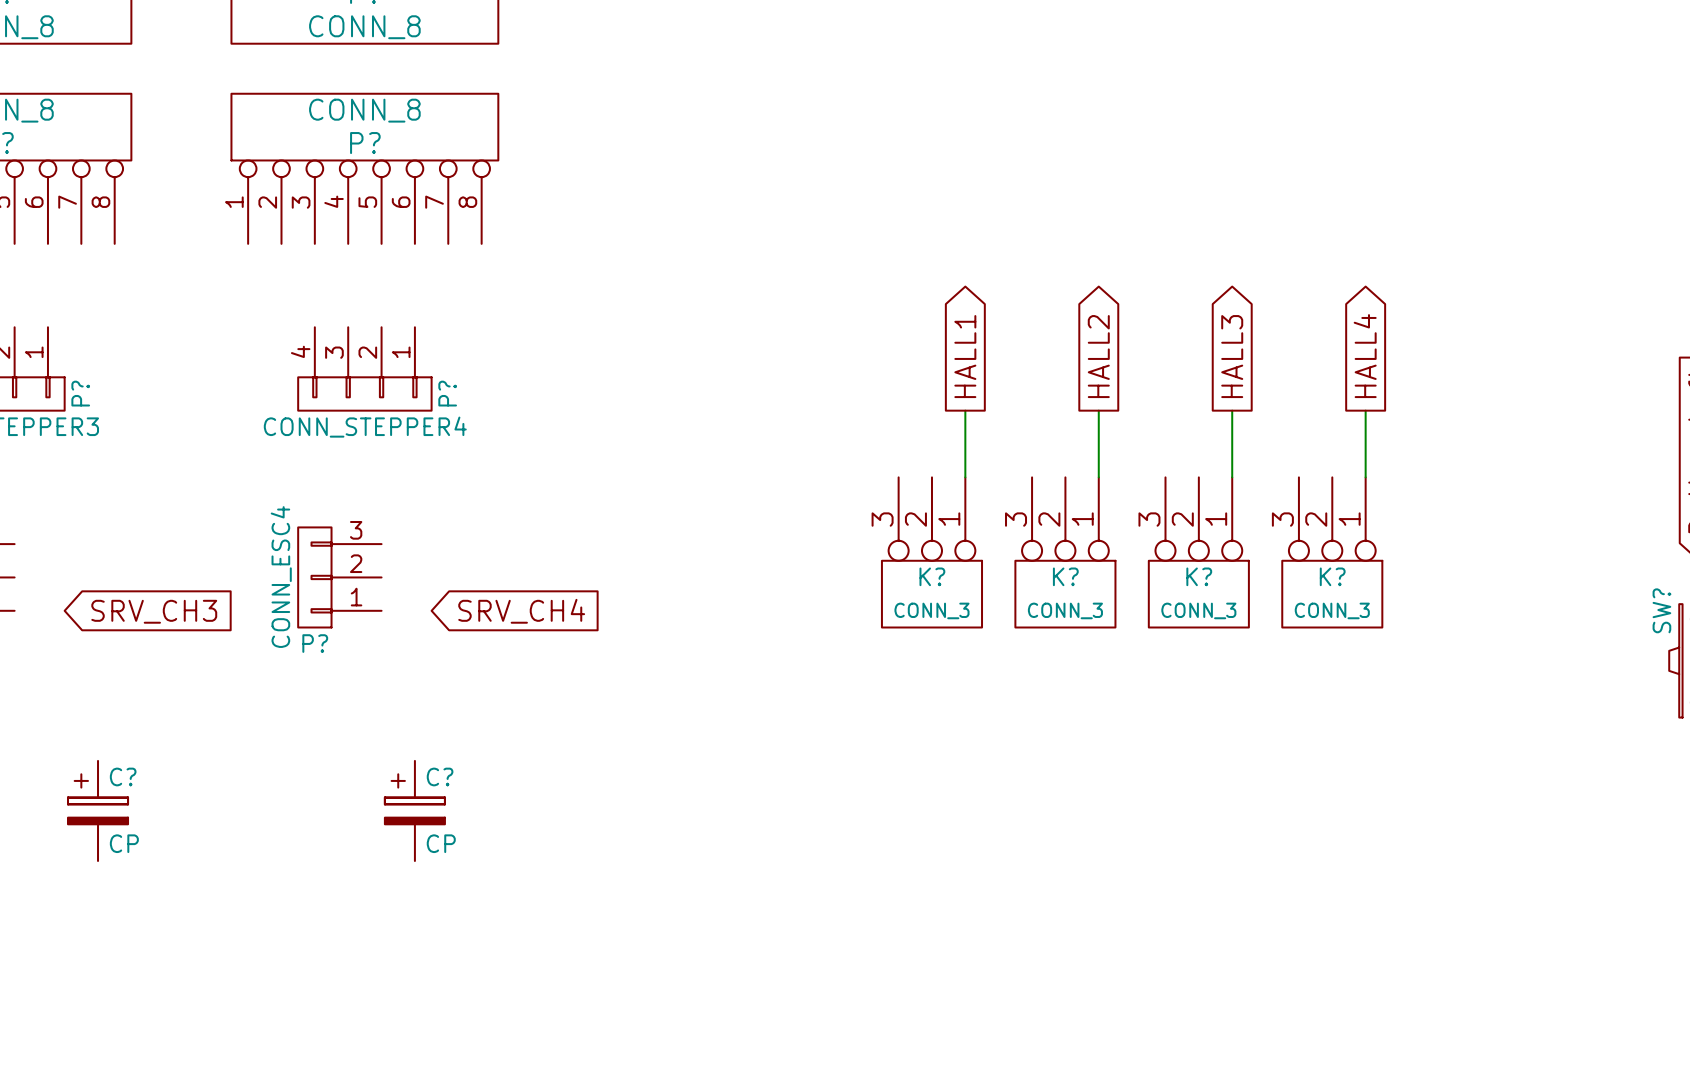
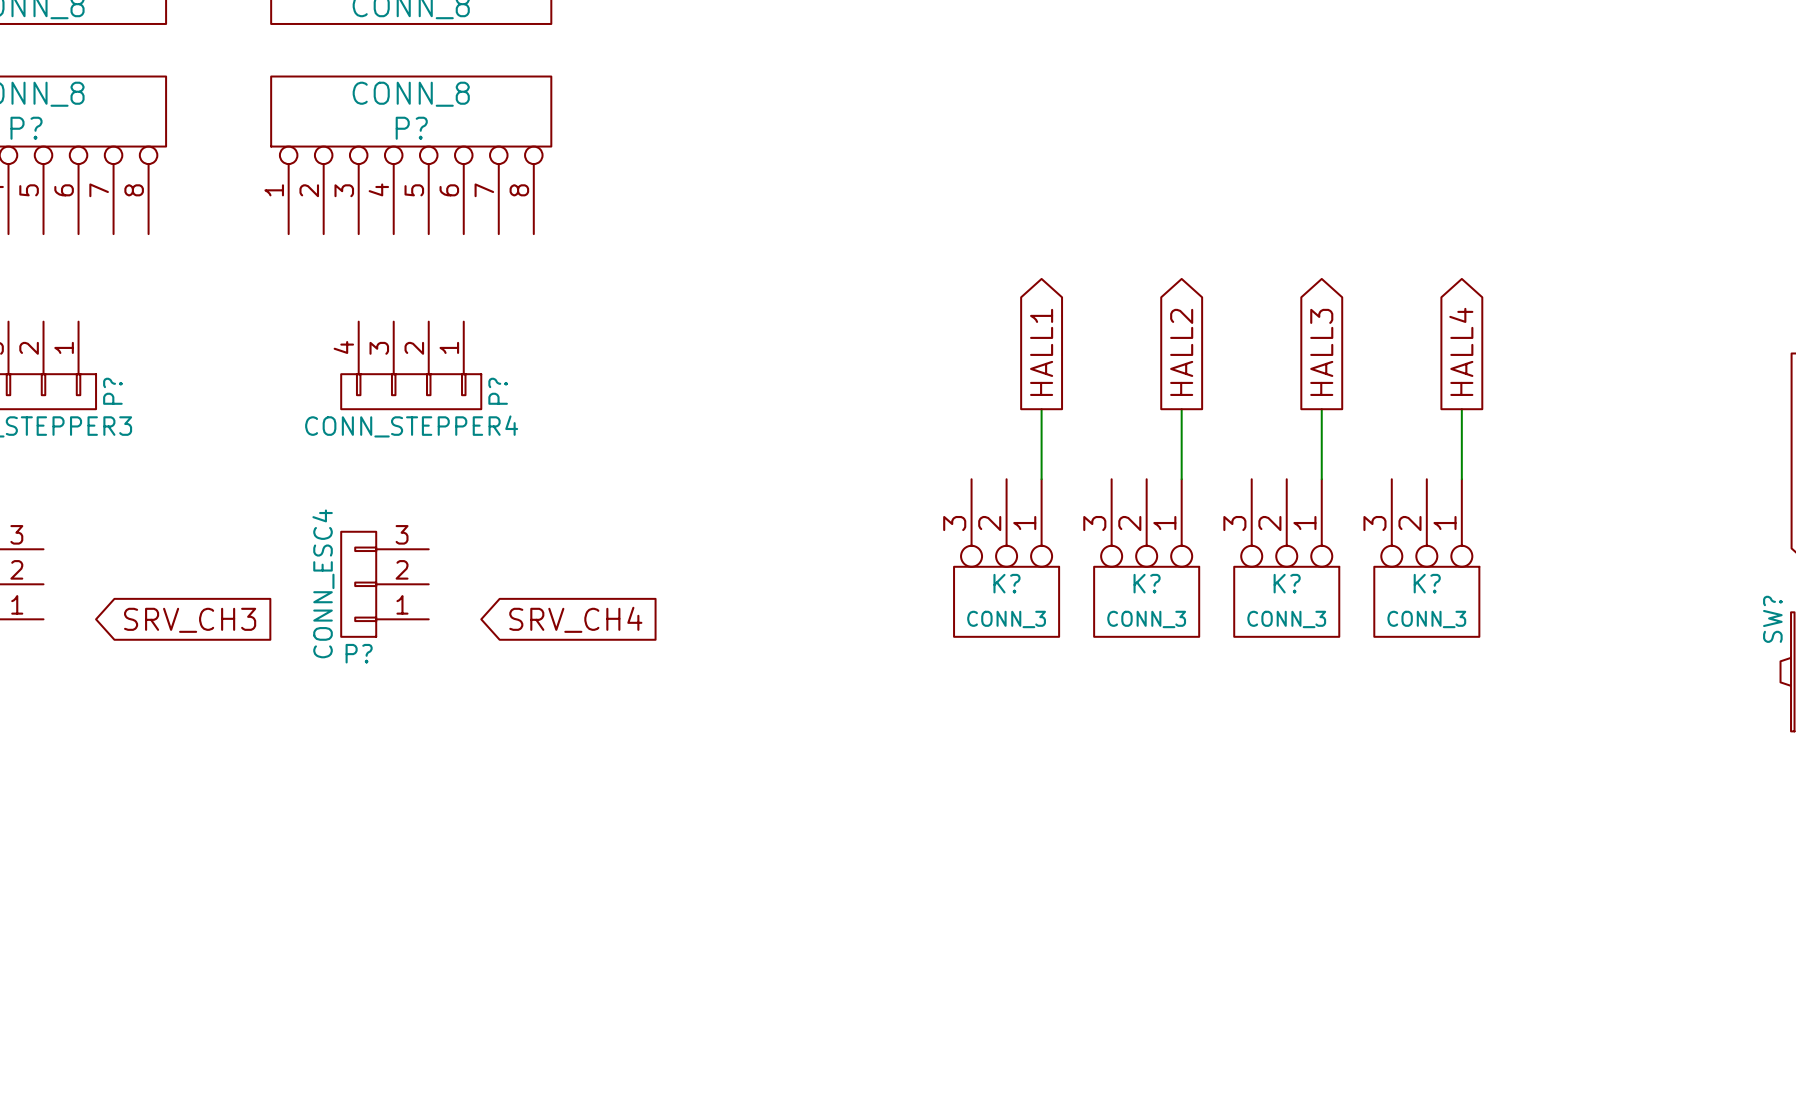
C?: CP (98, 810) -> none
C?: CP (414, 810) -> none

